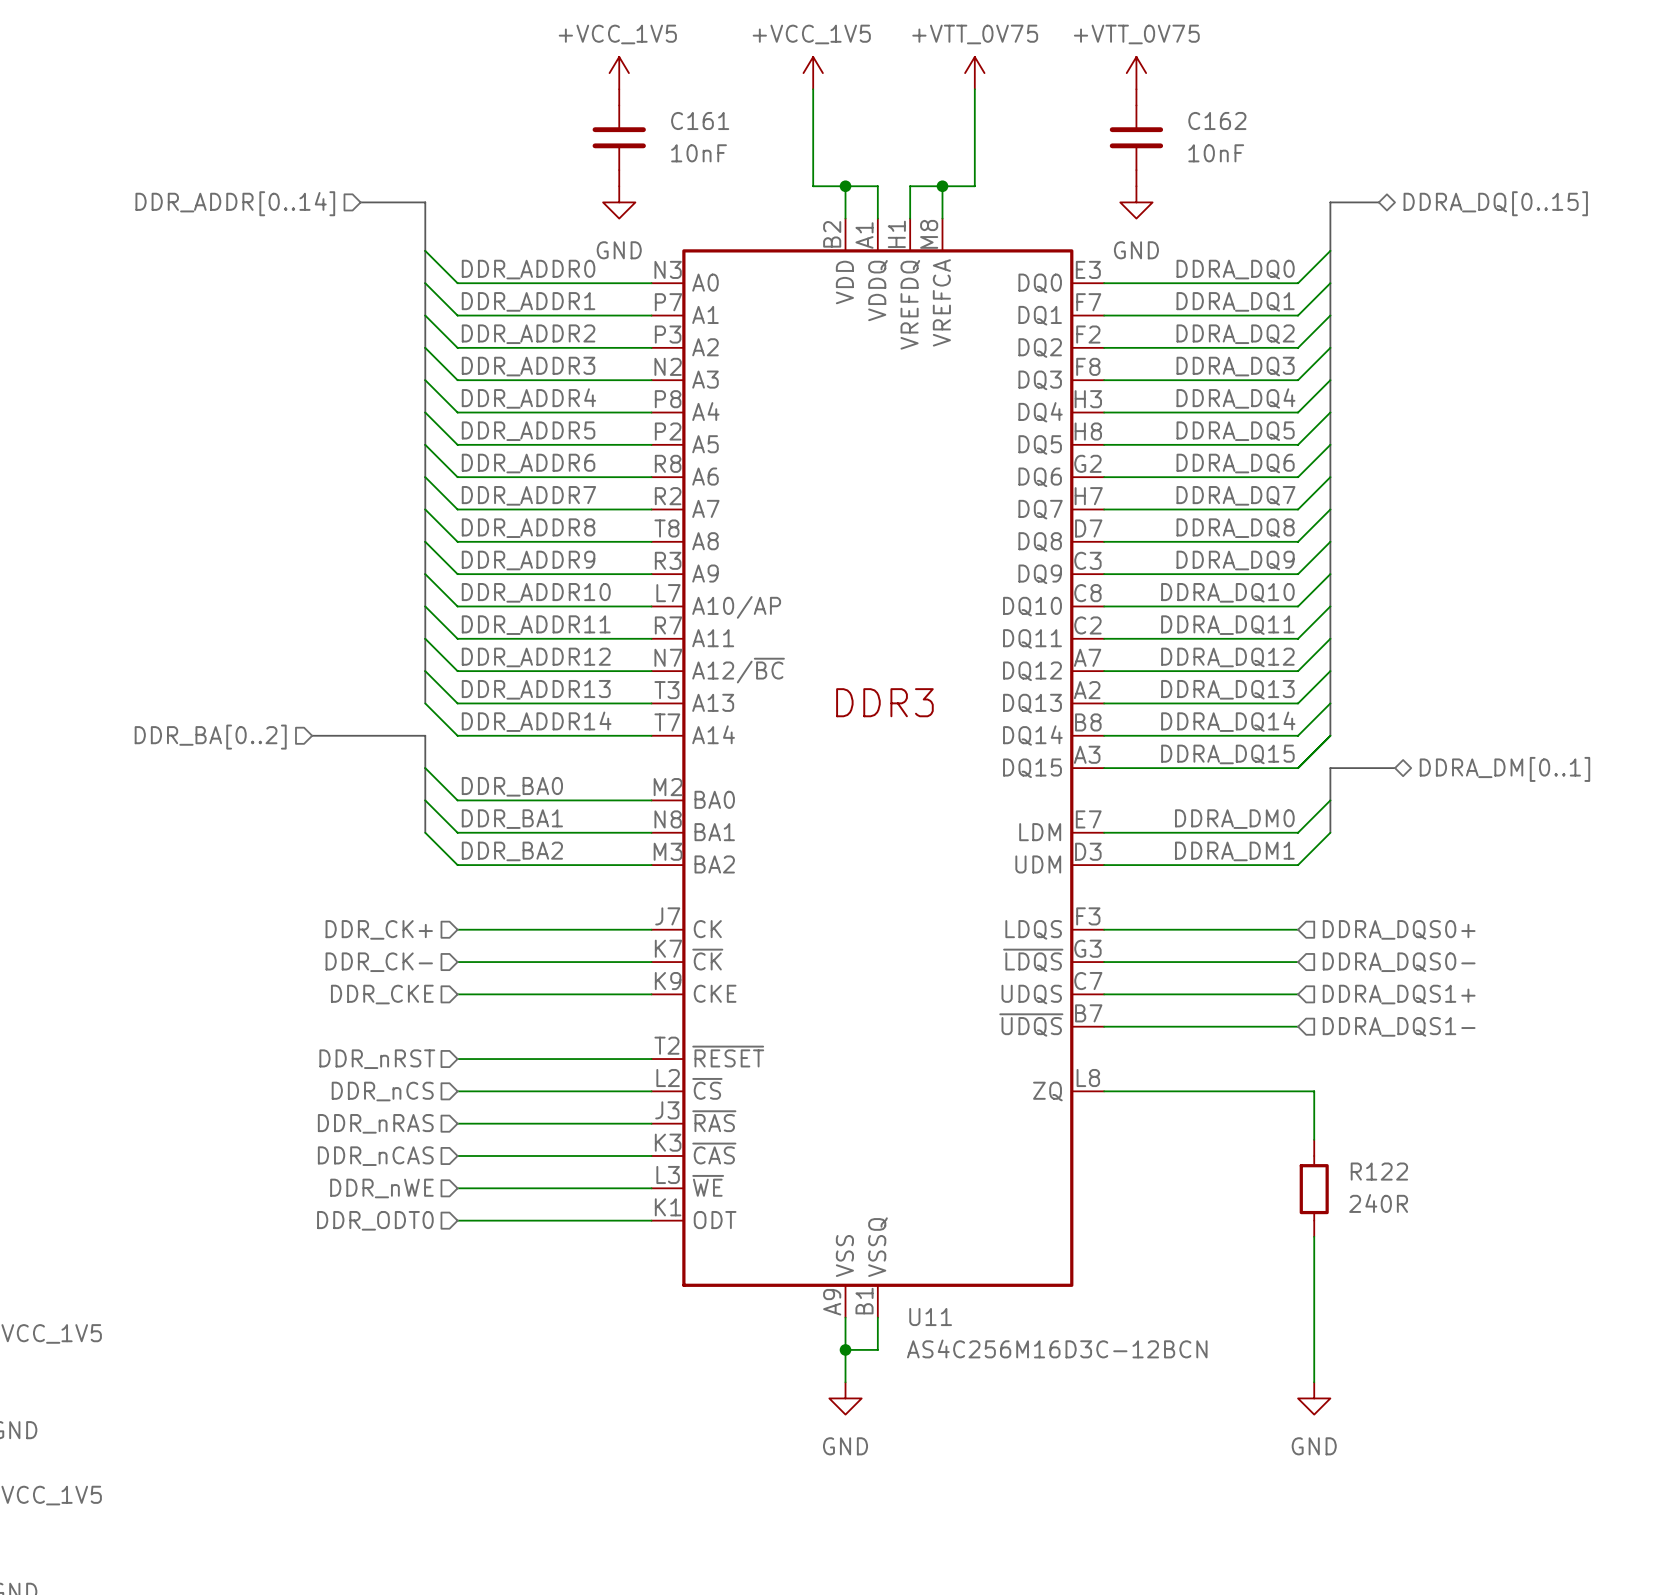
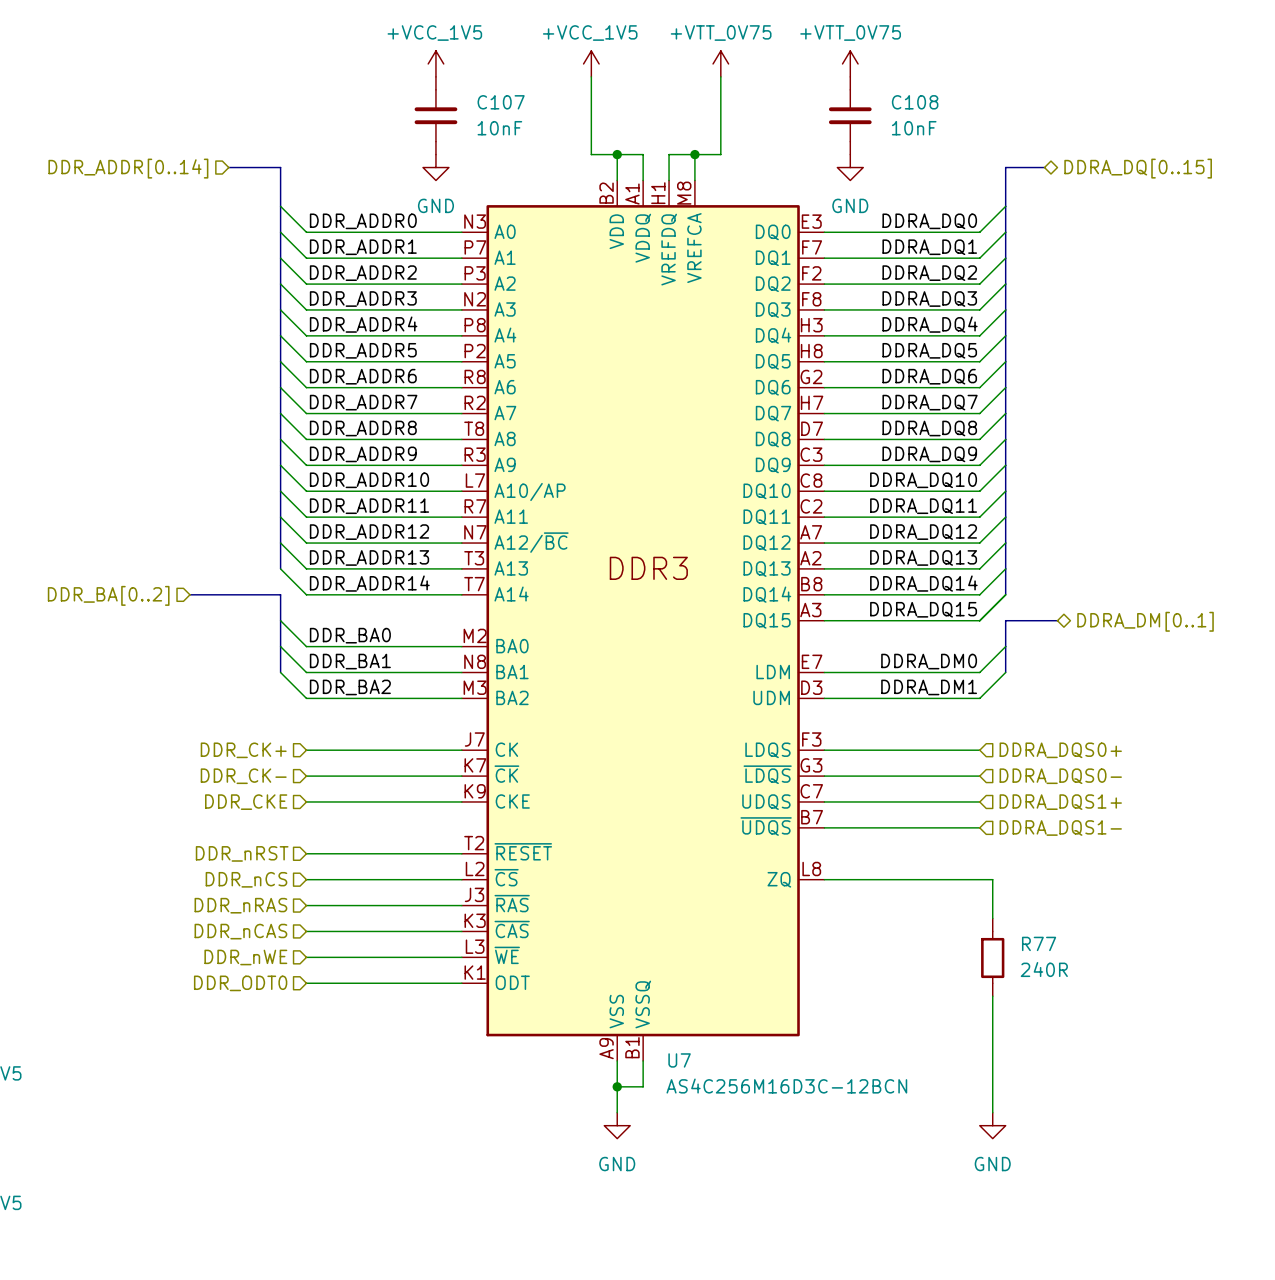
C161 name: C161 (700, 120) -> C107 (501, 102)
C162 name: C162 (1217, 120) -> C108 (915, 102)
R122 name: R122 (1379, 1171) -> R77 (1039, 943)
U11 name: U11 (930, 1317) -> U7 (679, 1060)

